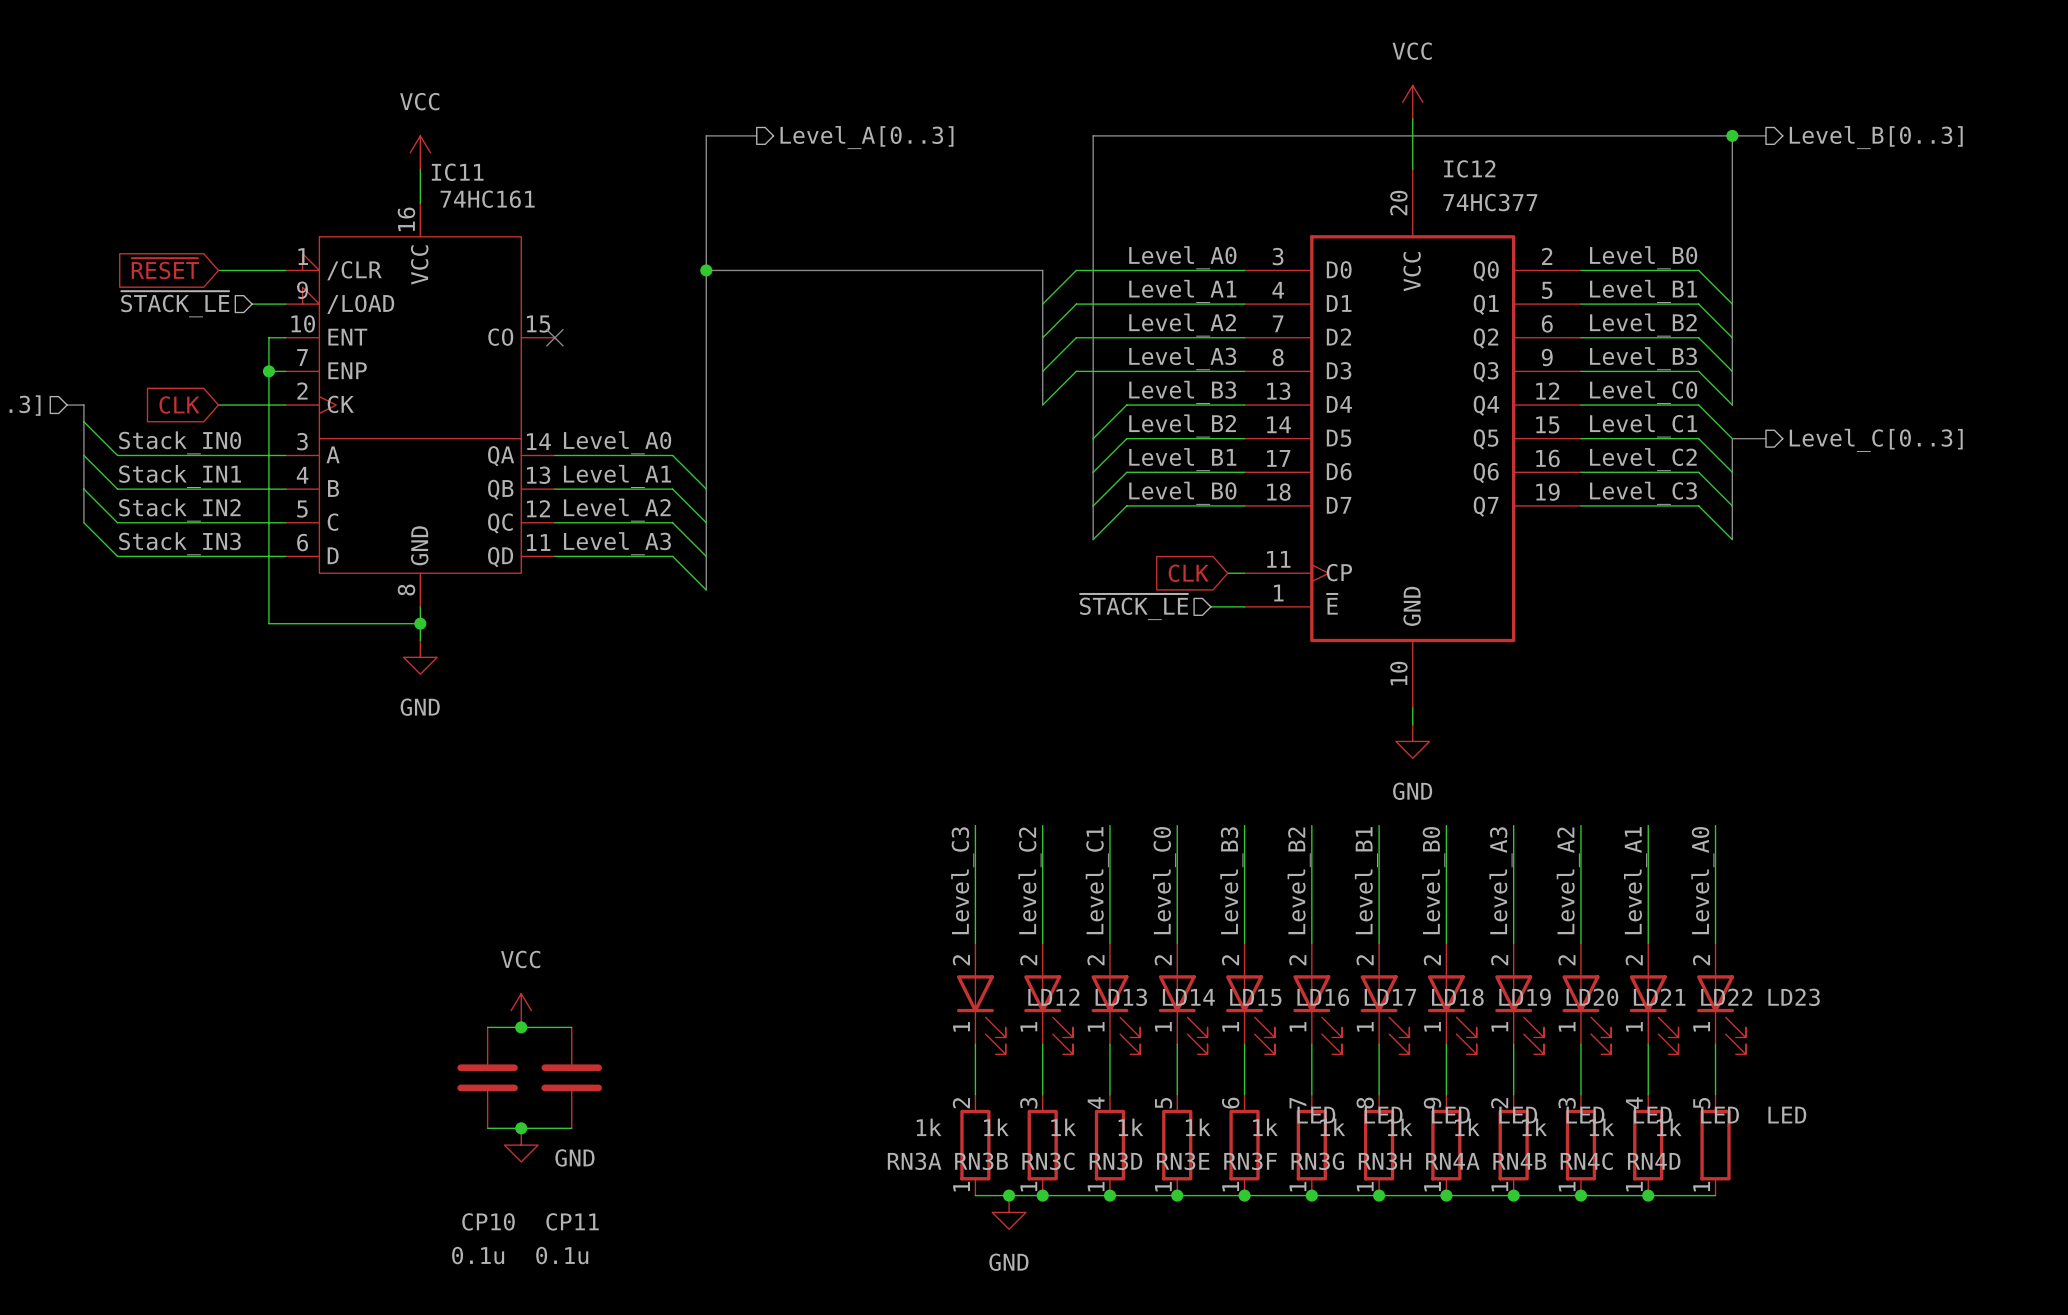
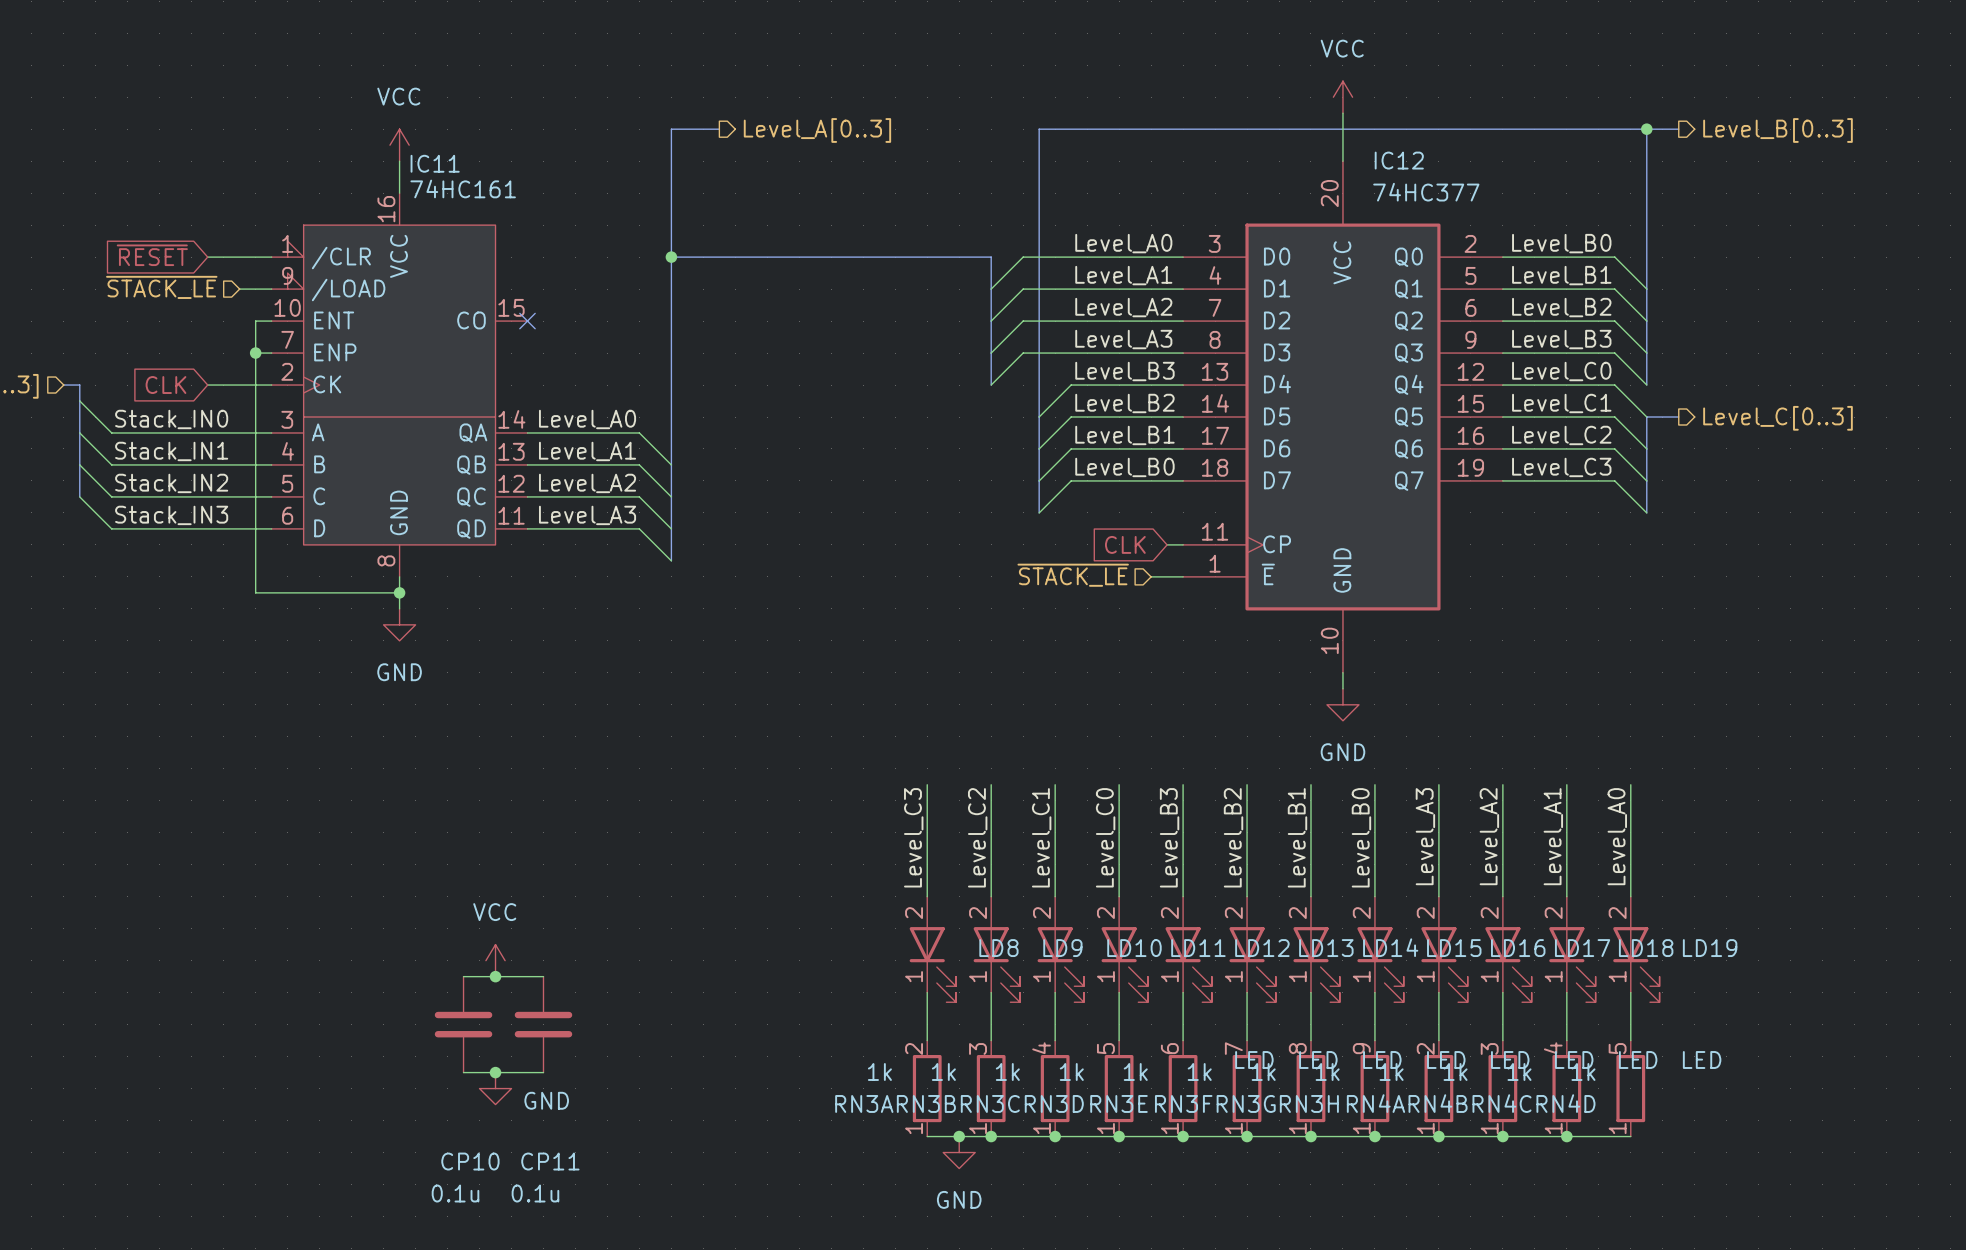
LD12 name: LD12 (1053, 997) -> LD8 (998, 948)
LD13 name: LD13 (1121, 997) -> LD9 (1062, 948)
LD14 name: LD14 (1188, 997) -> LD10 (1134, 948)
LD15 name: LD15 (1255, 997) -> LD11 (1198, 948)
LD16 name: LD16 (1323, 997) -> LD12 (1262, 948)
LD17 name: LD17 (1390, 997) -> LD13 (1326, 948)
LD18 name: LD18 (1457, 997) -> LD14 (1390, 947)
LD19 name: LD19 (1525, 997) -> LD15 (1454, 948)
LD20 name: LD20 (1592, 997) -> LD16 (1518, 948)
LD21 name: LD21 (1659, 997) -> LD17 (1582, 948)
LD22 name: LD22 (1726, 997) -> LD18 (1646, 948)
LD23 name: LD23 (1794, 997) -> LD19 (1710, 948)

